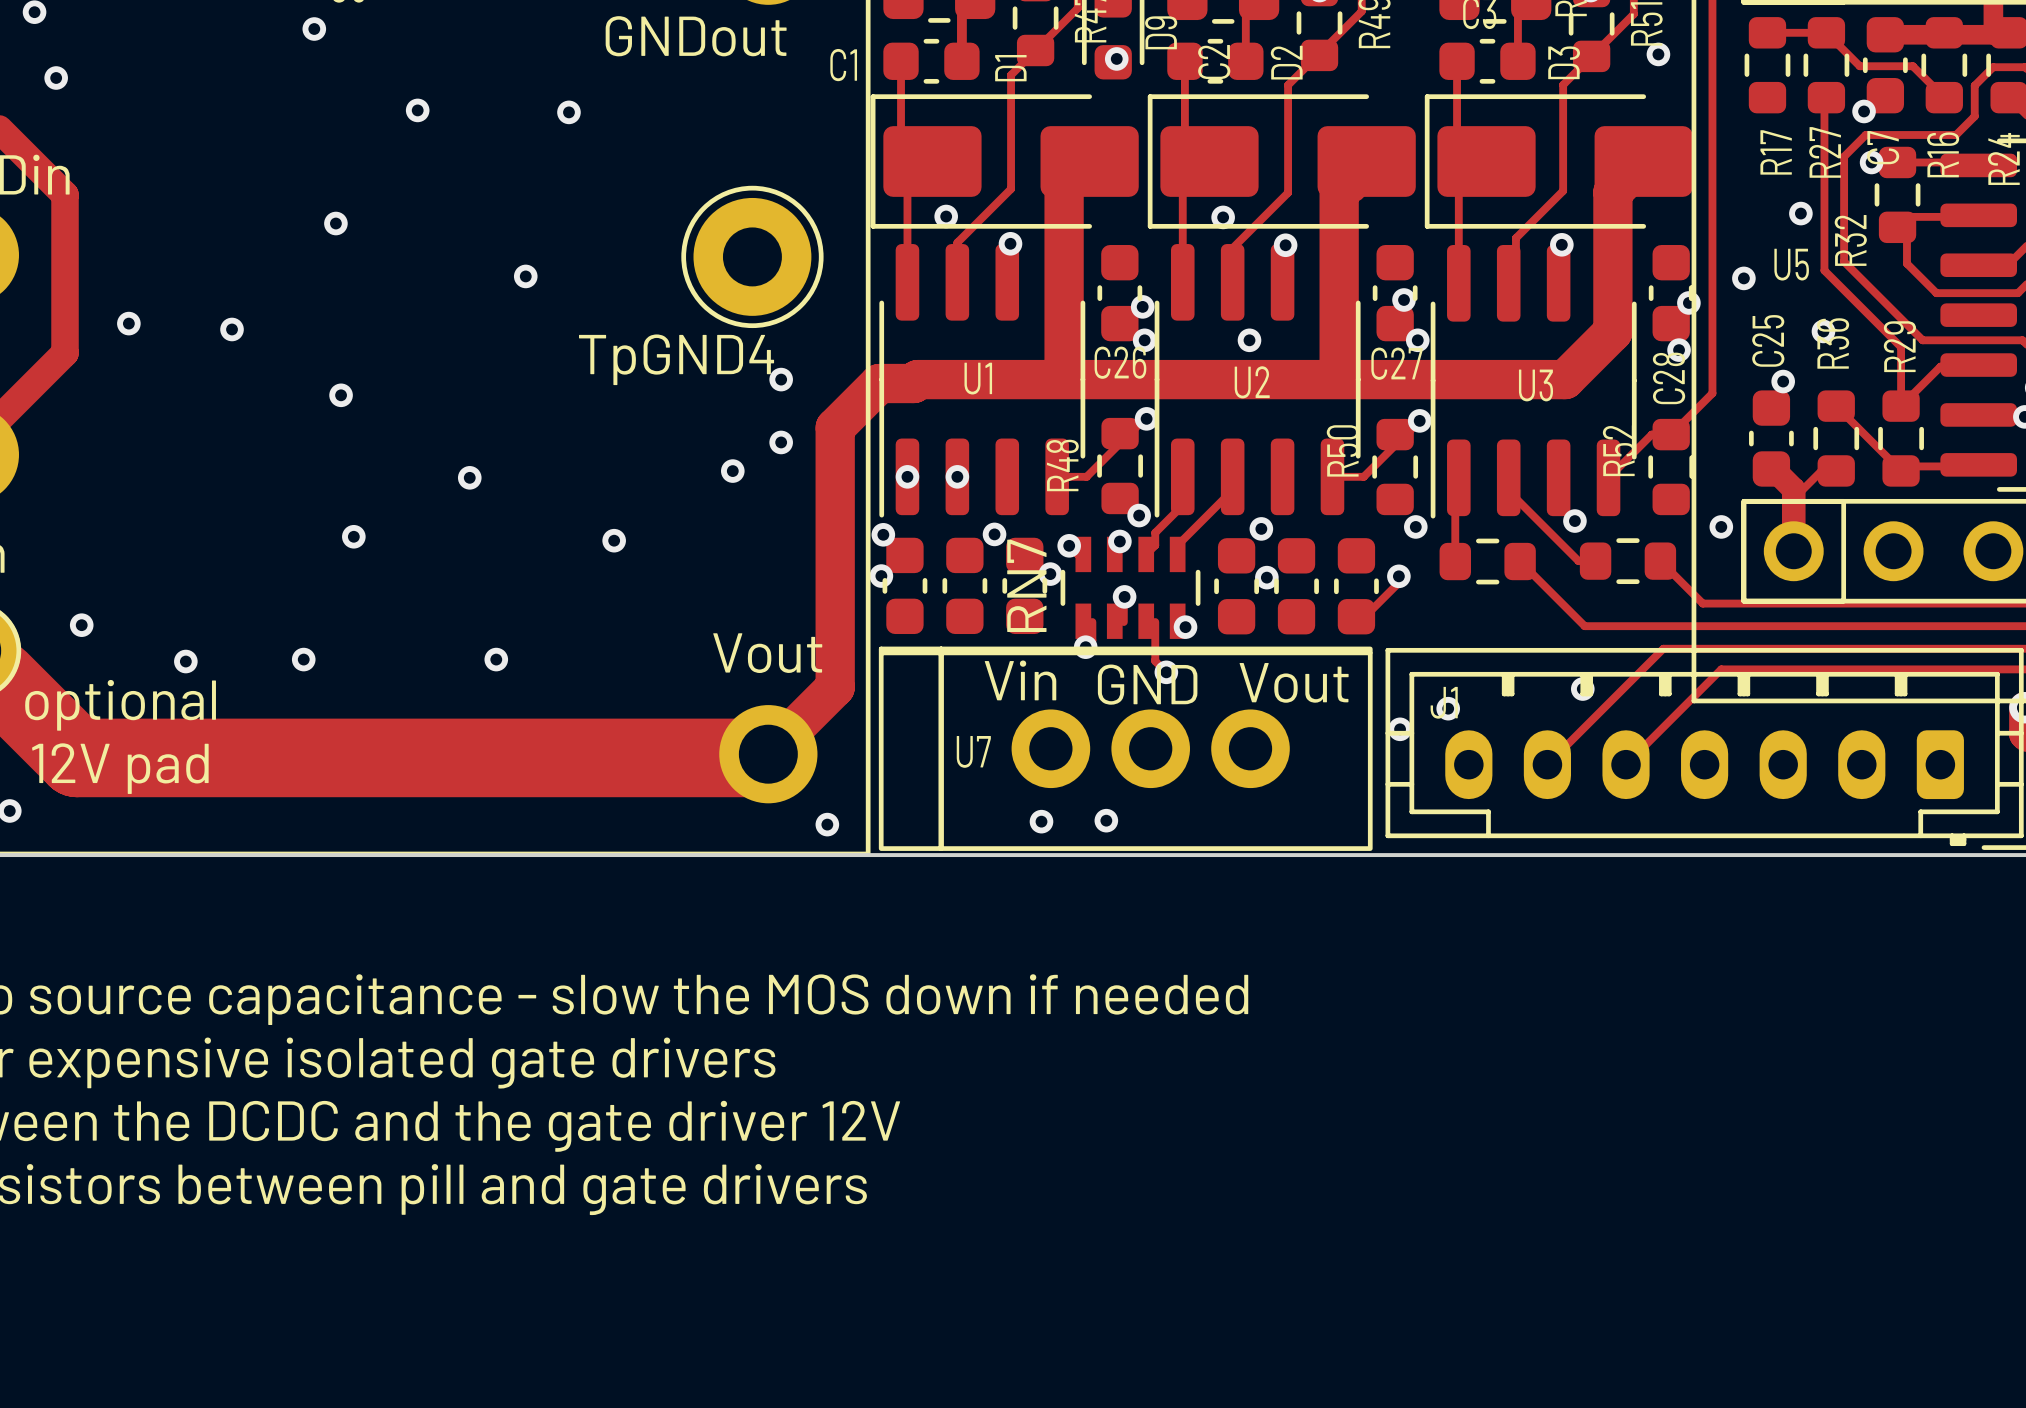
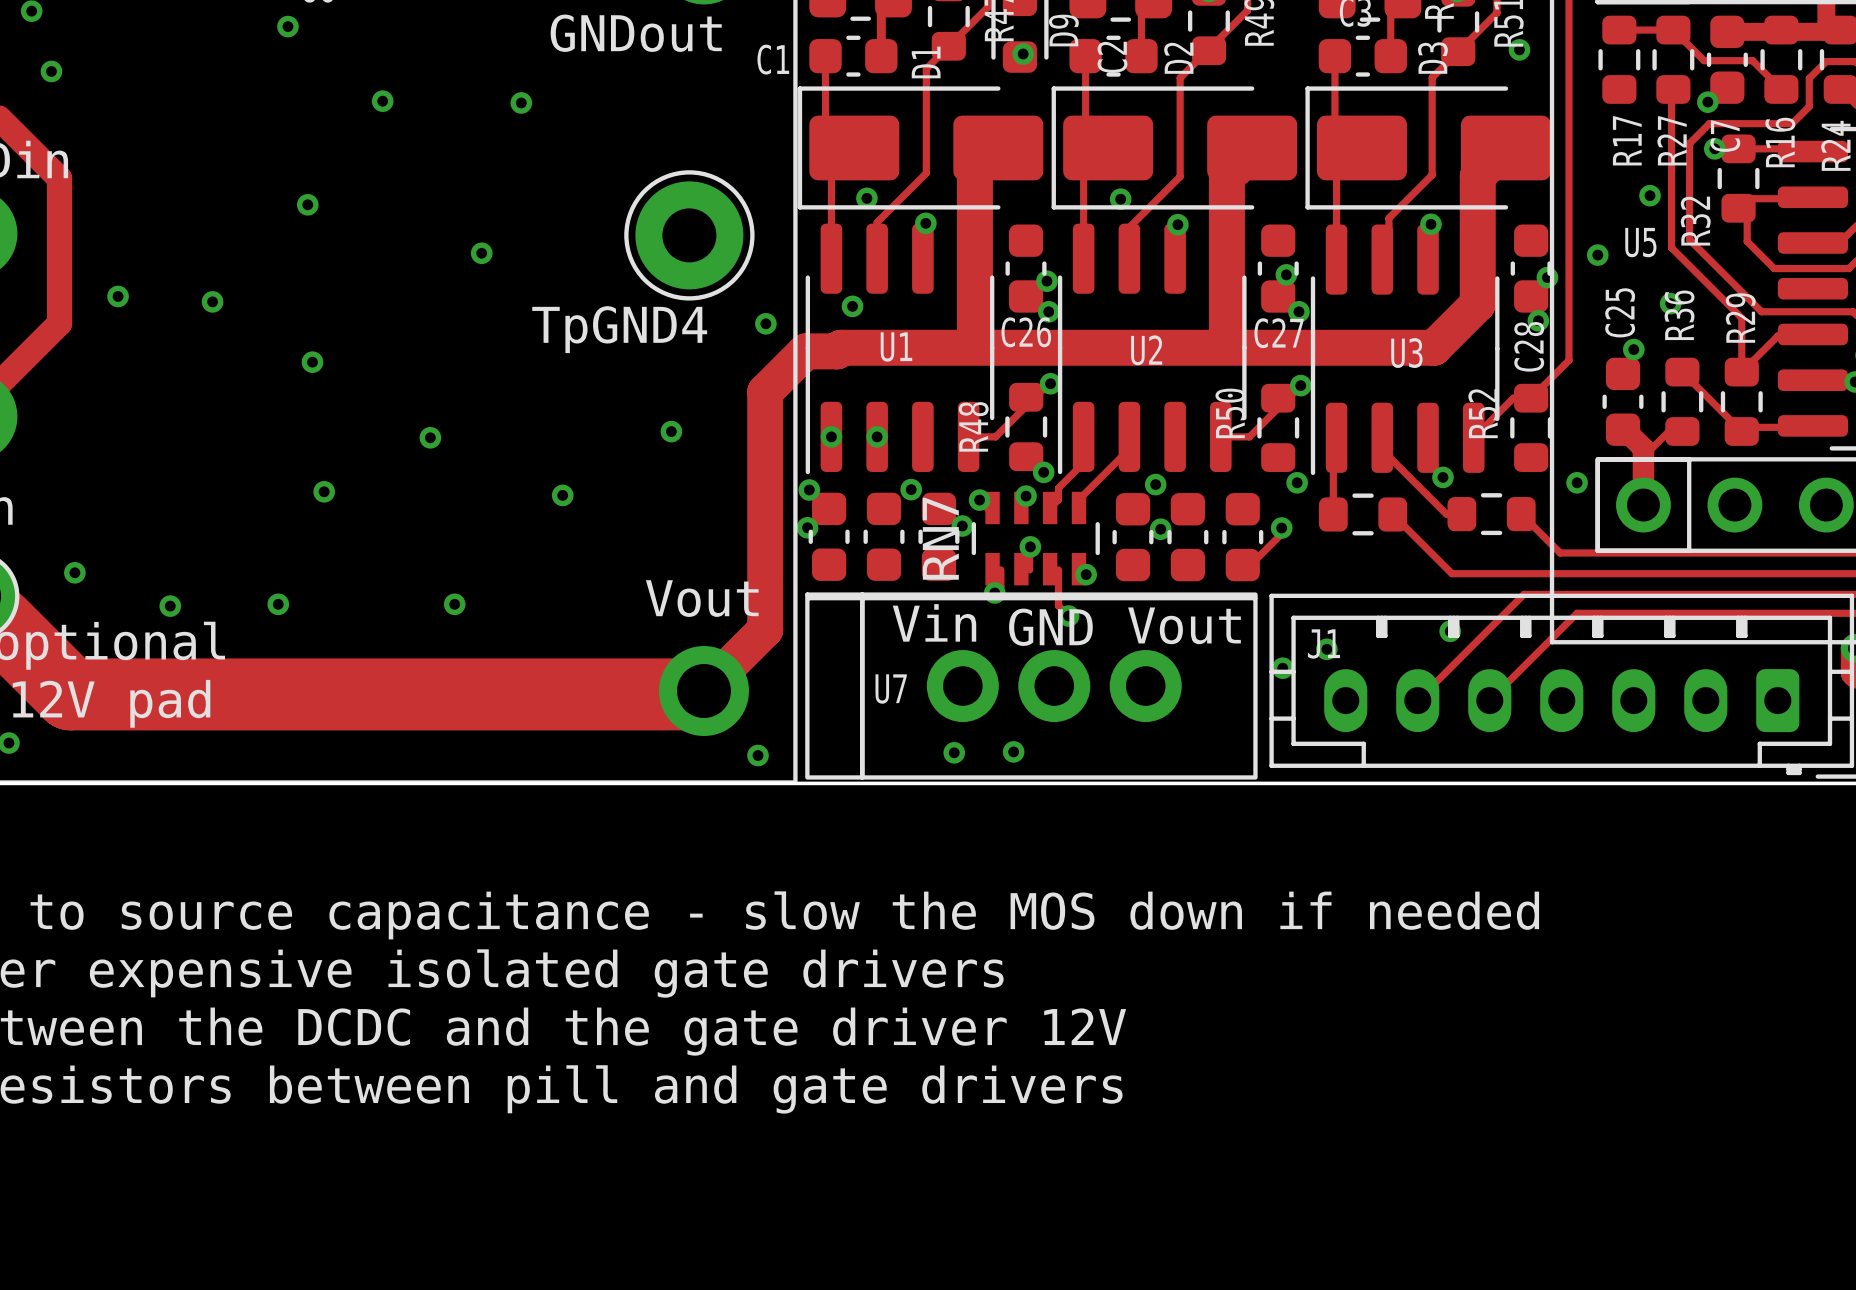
via: none -> (852, 306)
via: (1249, 340) -> none
via: none -> (765, 323)
via: (781, 379) -> none
via: (781, 442) -> none

